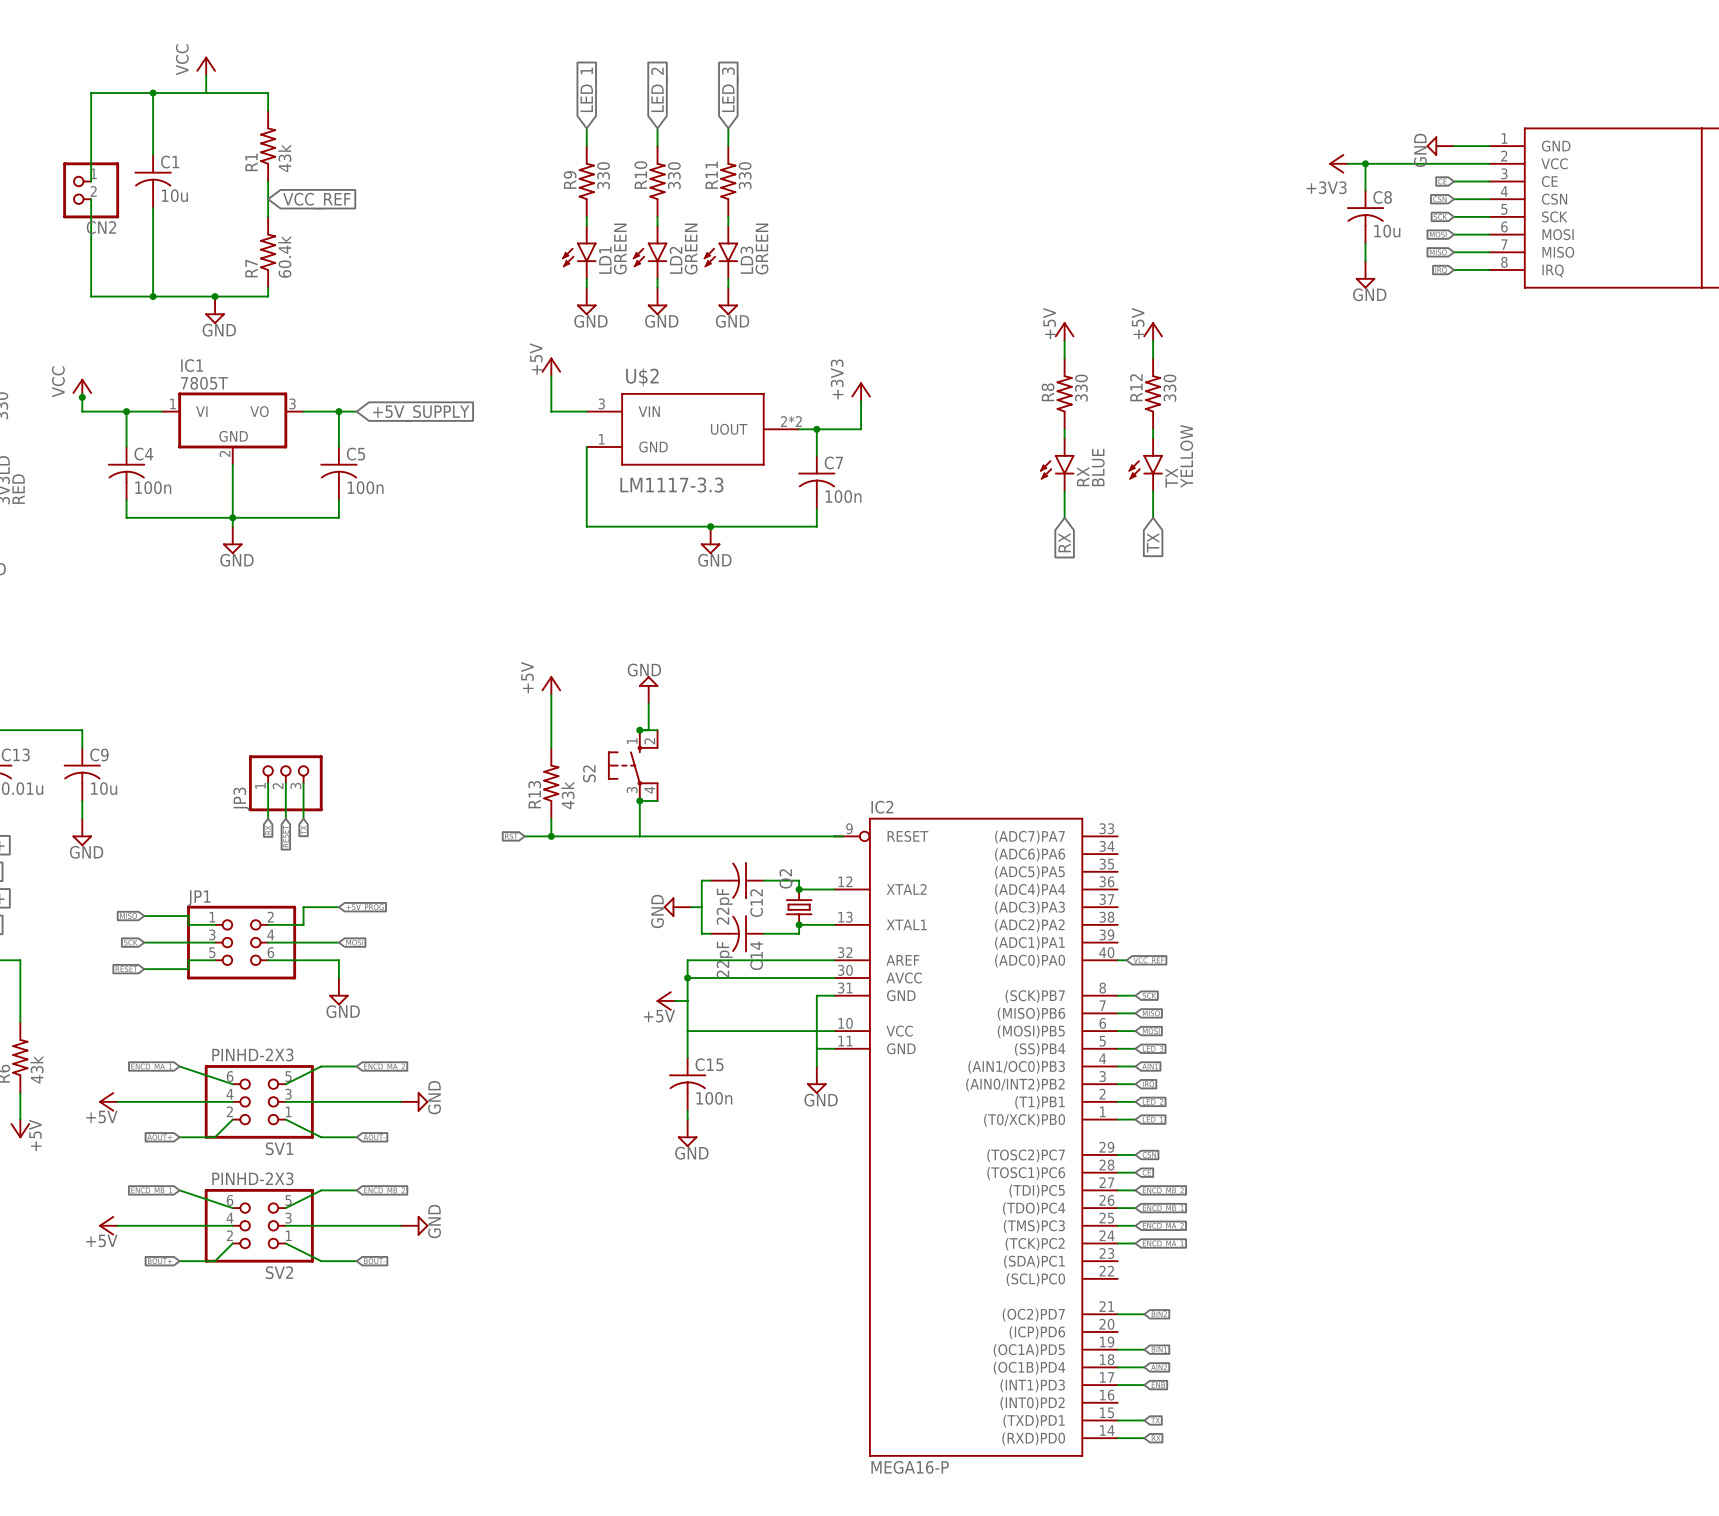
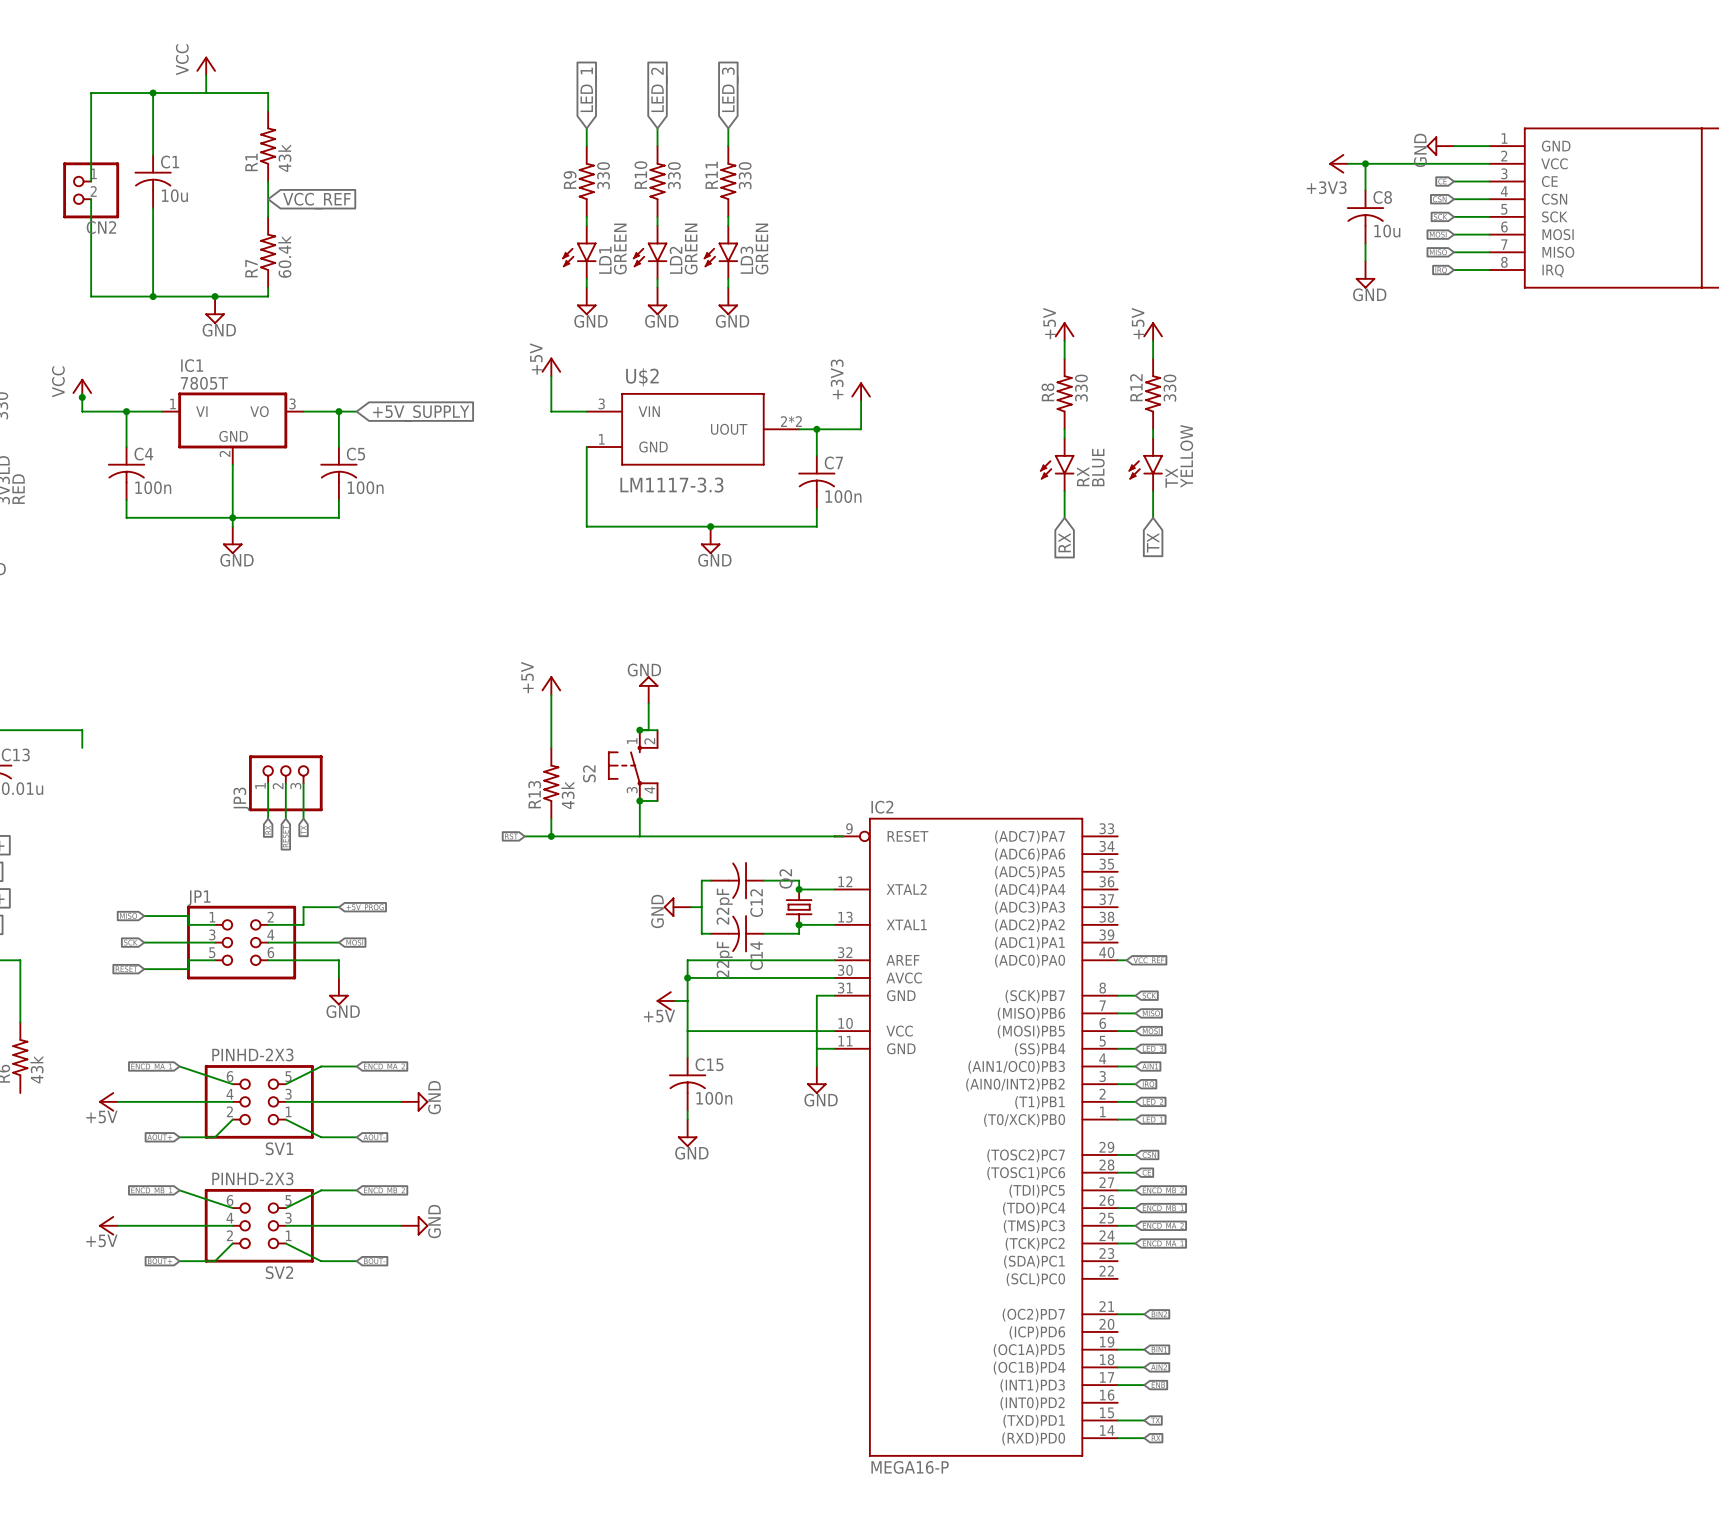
C9: 10u (82, 774) -> none
wire: (82, 800) (82, 818) -> none
power symbol: GND (82, 832) -> none
wire: (20, 1093) (20, 1119) -> none
power symbol: +5V (20, 1128) -> none

